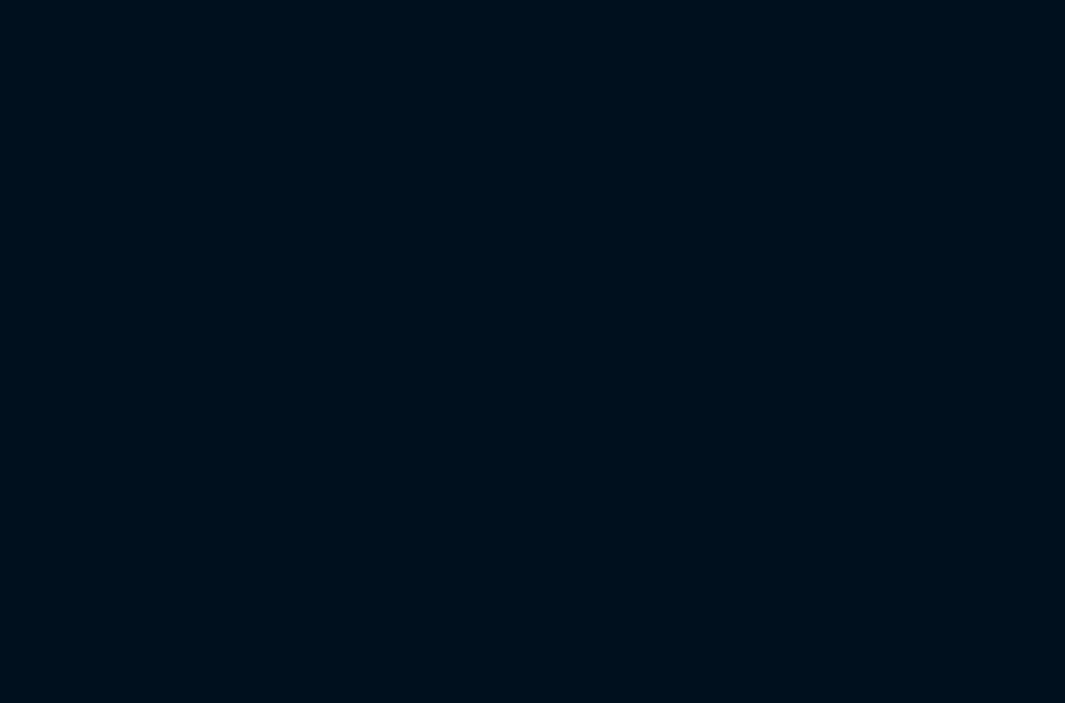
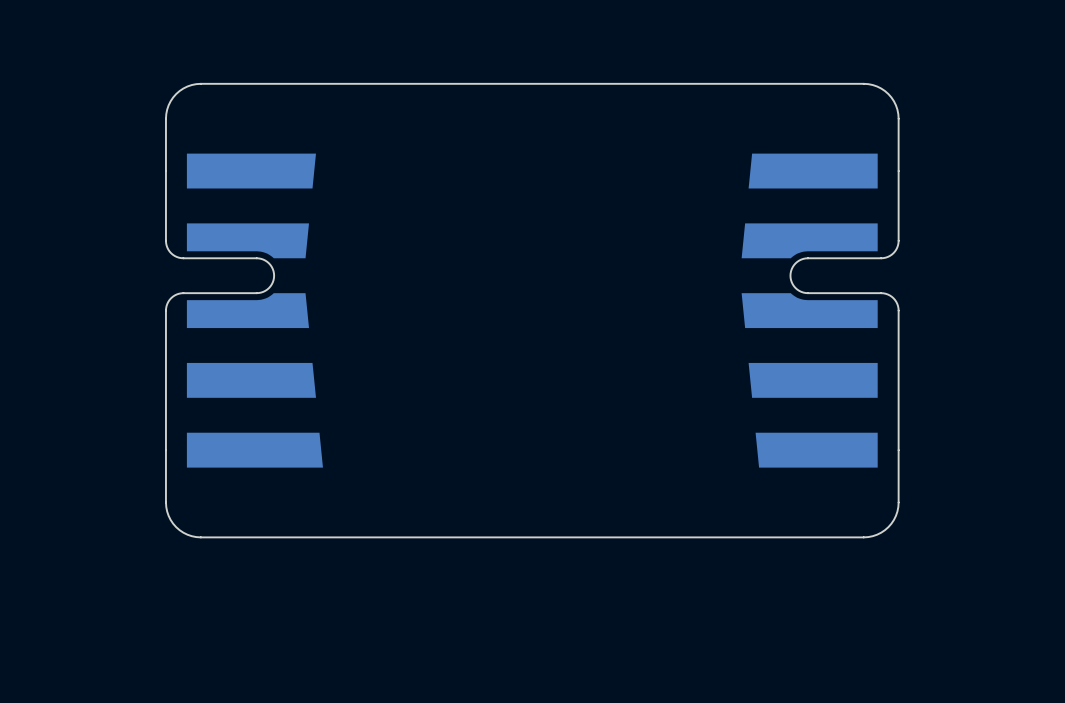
board edge: none -> (898, 171) (898, 118) (895, 105) (884, 91) (877, 86) (863, 83) (196, 84) (179, 91) (168, 105) (165, 118) (165, 171)
part: none -> (244, 310)
part: none -> (820, 310)
board edge: none -> (898, 450) (898, 502) (895, 515) (884, 530) (877, 534) (863, 537) (196, 537) (179, 530) (168, 515) (165, 502) (165, 450)

